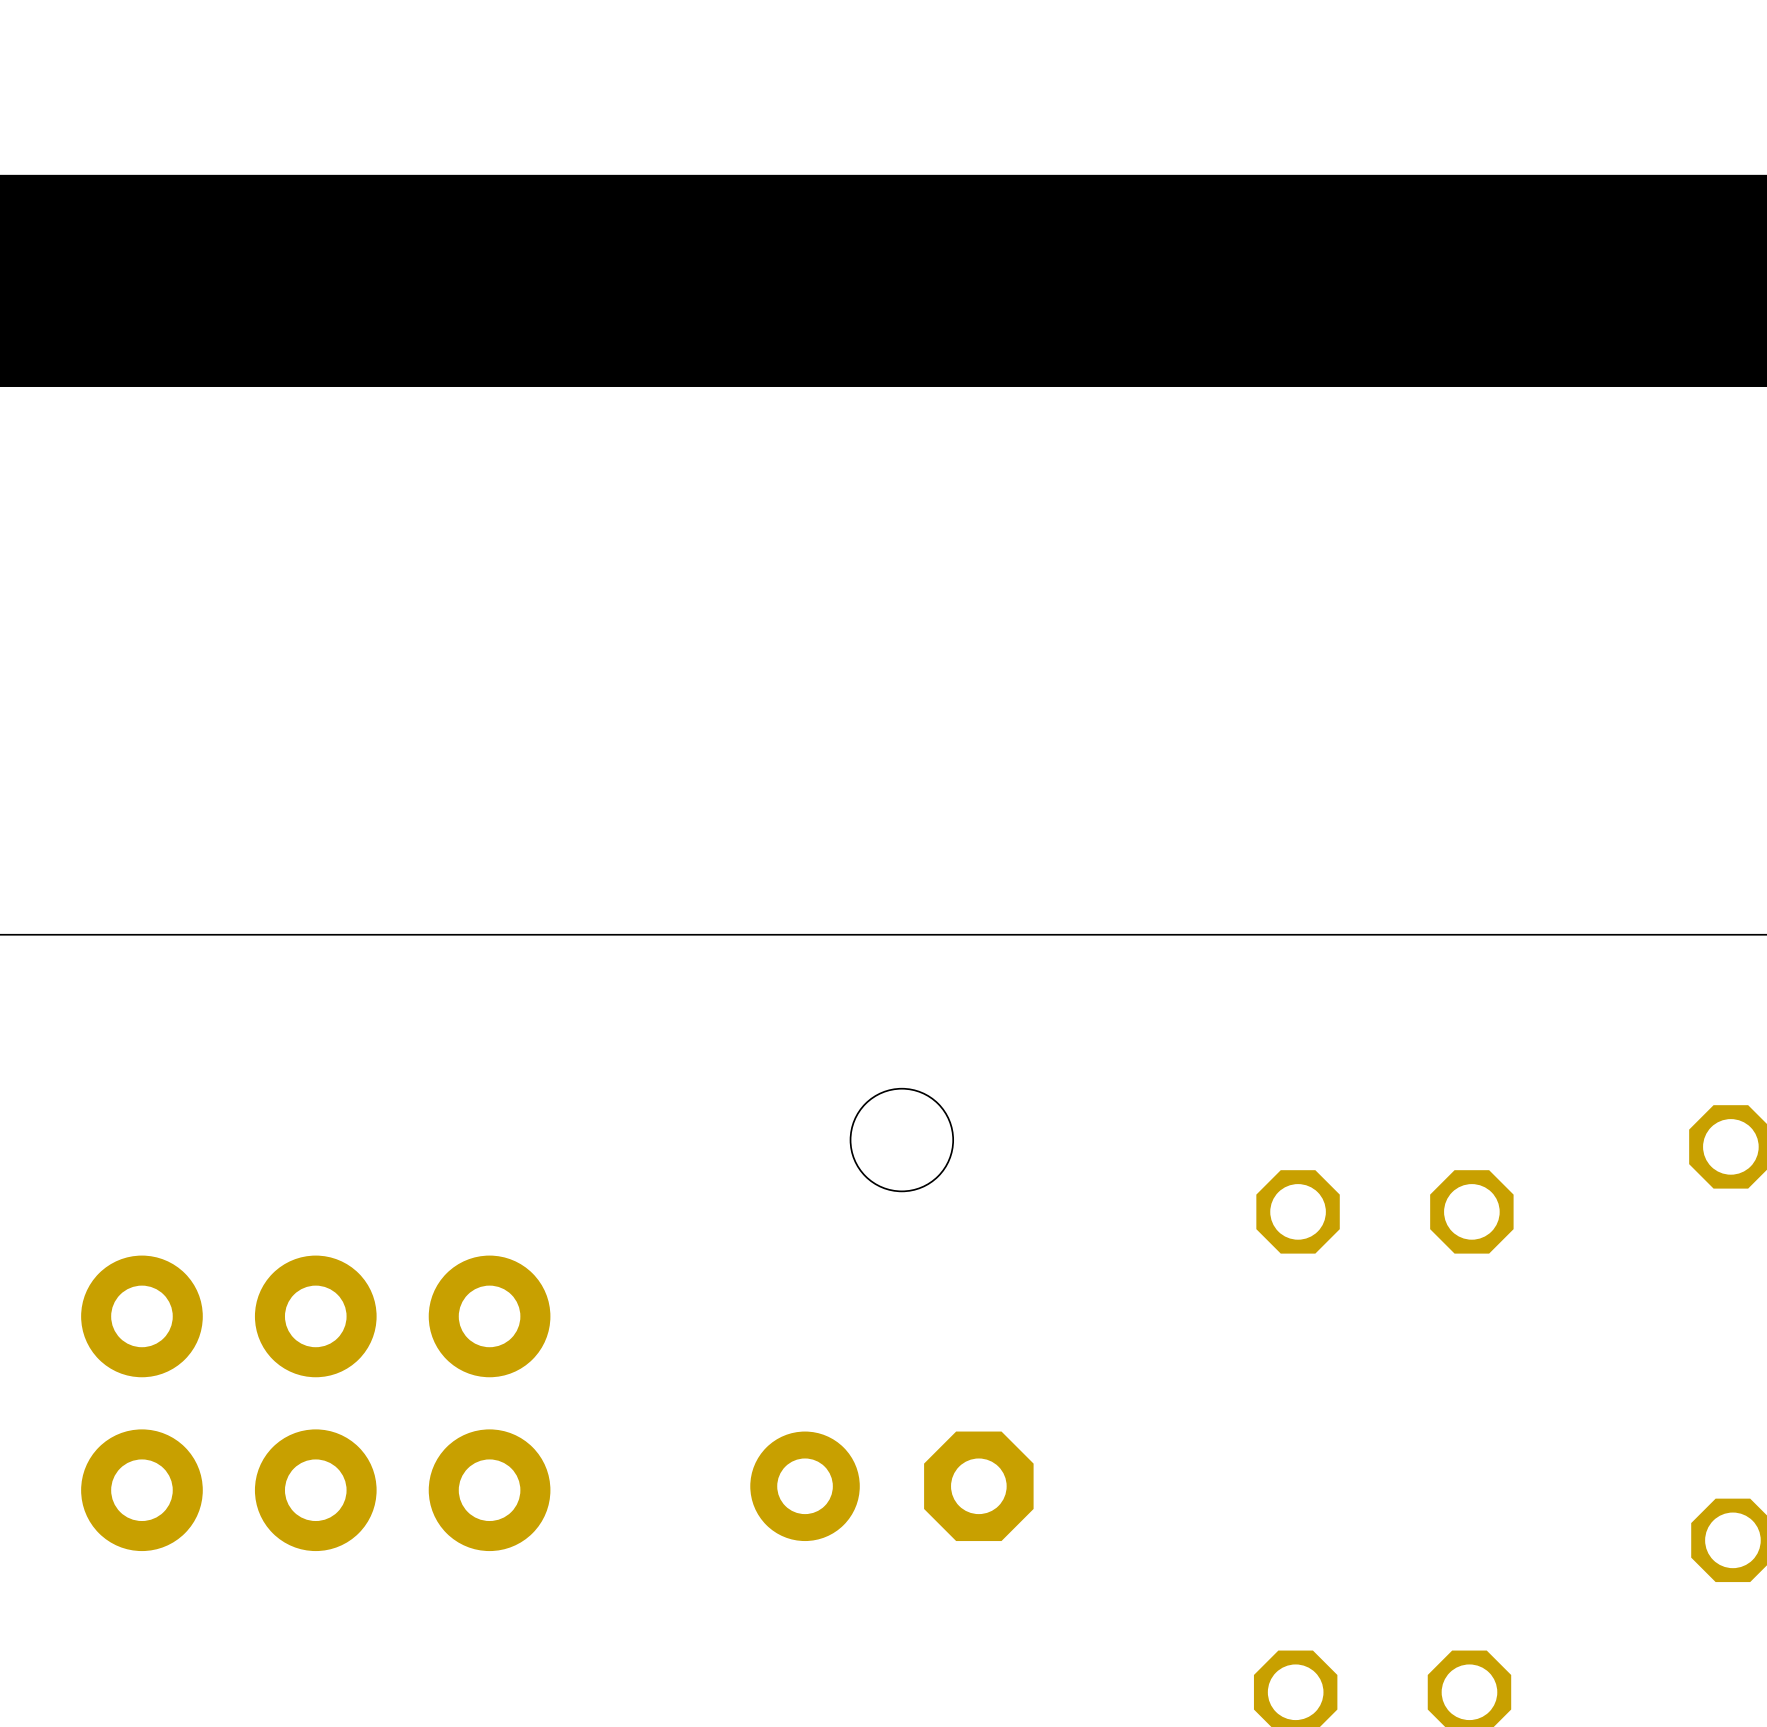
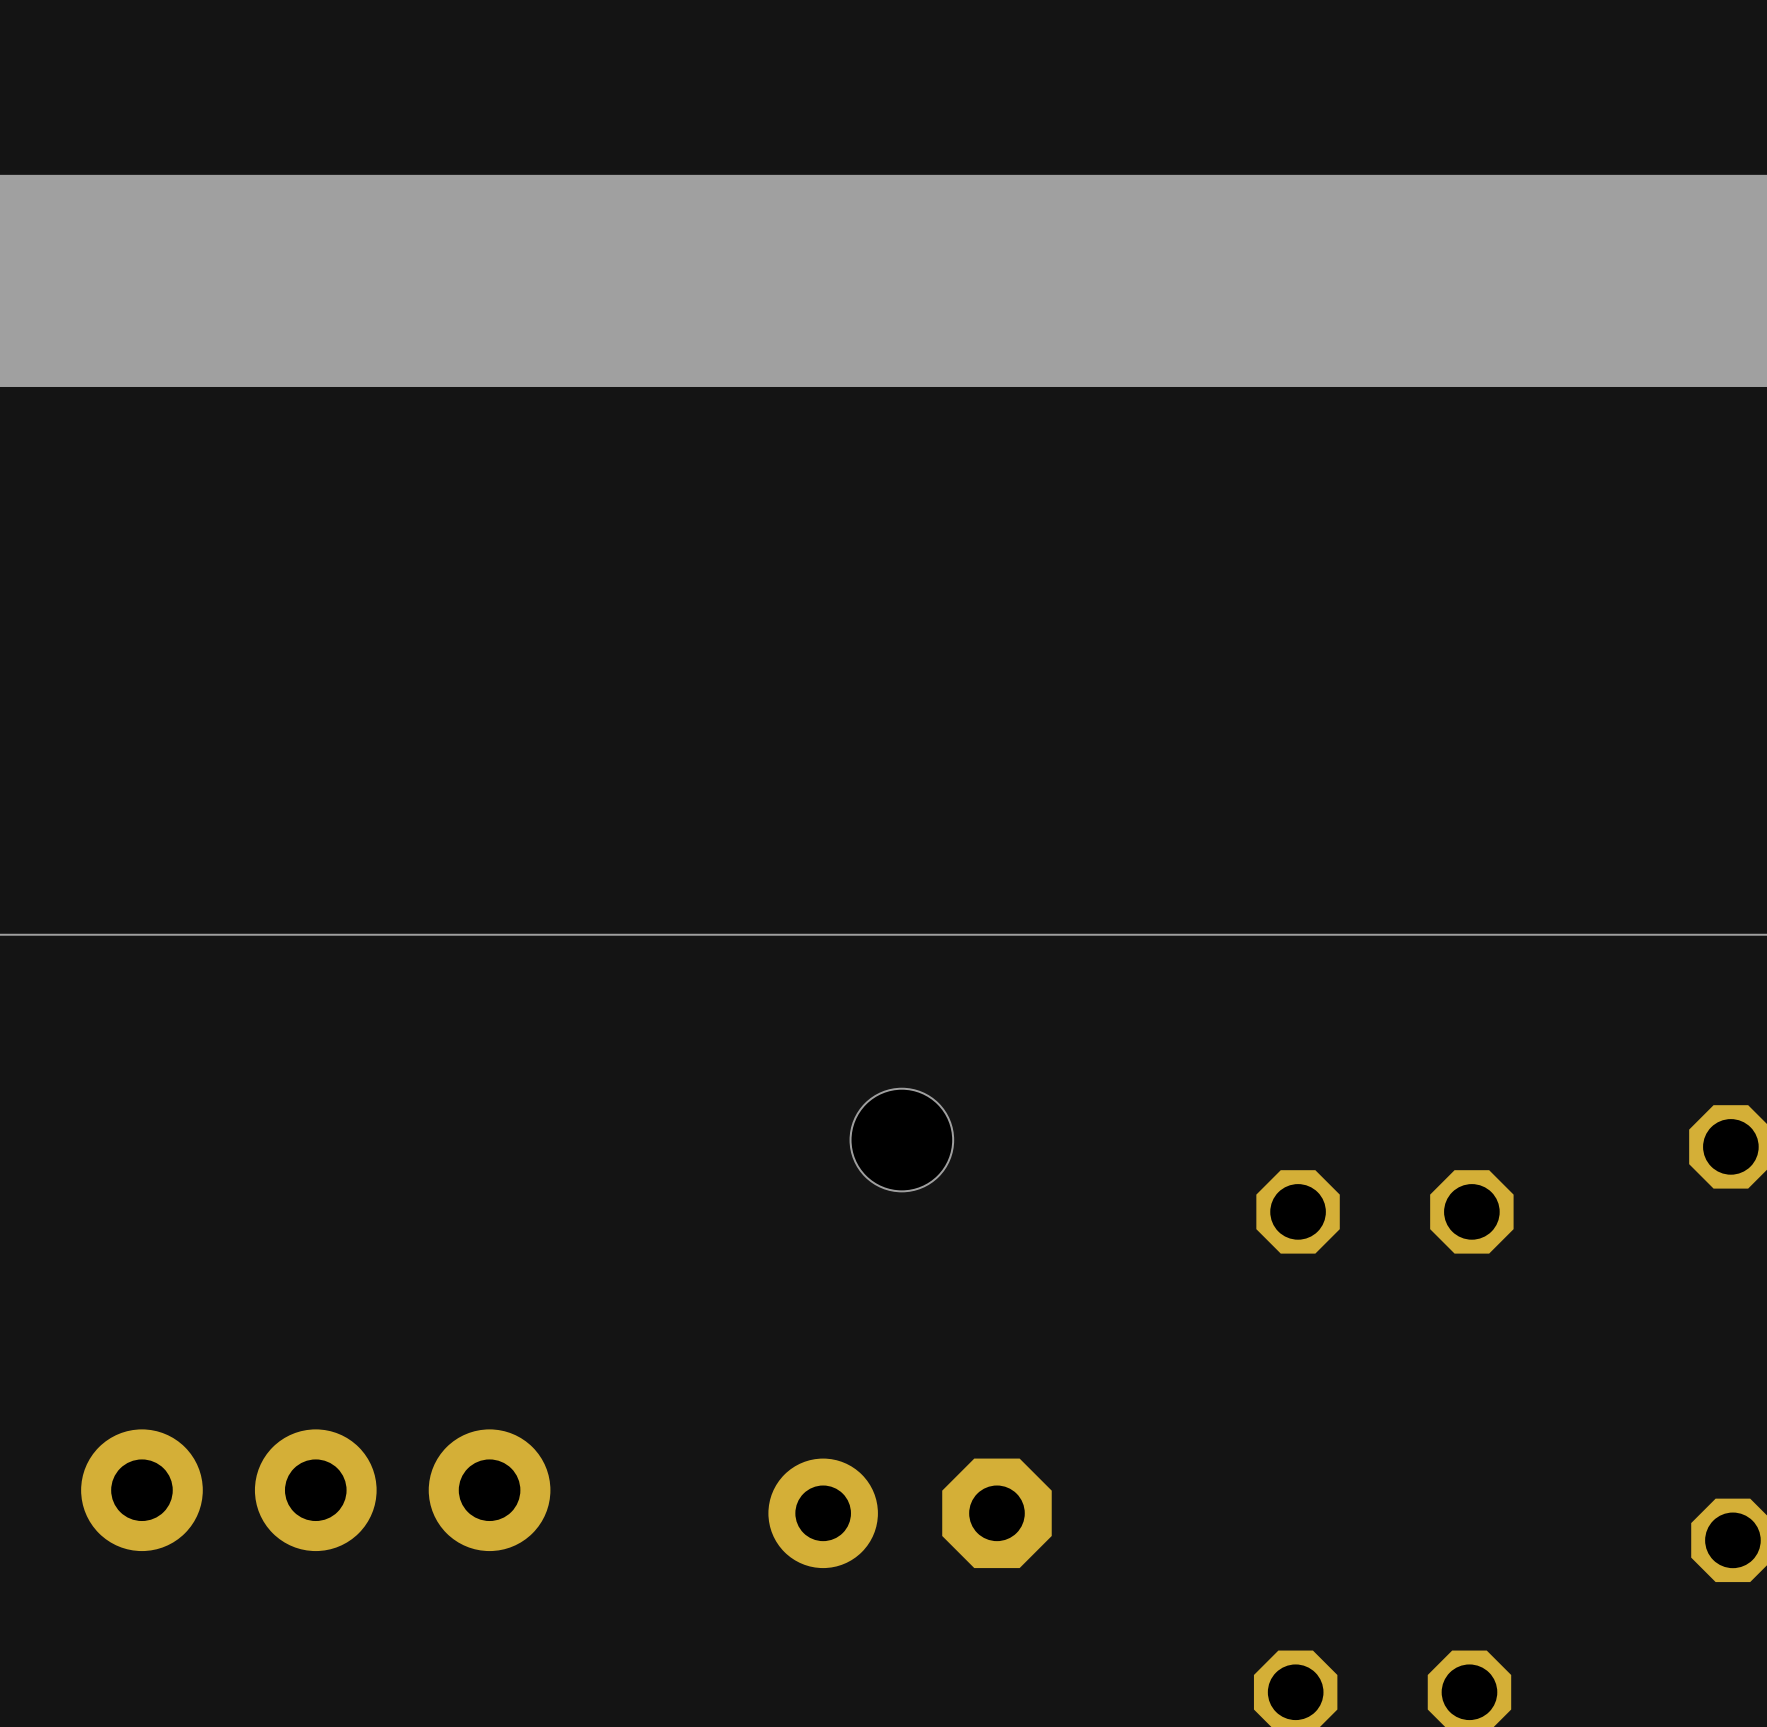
part: (315, 1403) -> none
part position: (891, 1486) -> (910, 1513)

